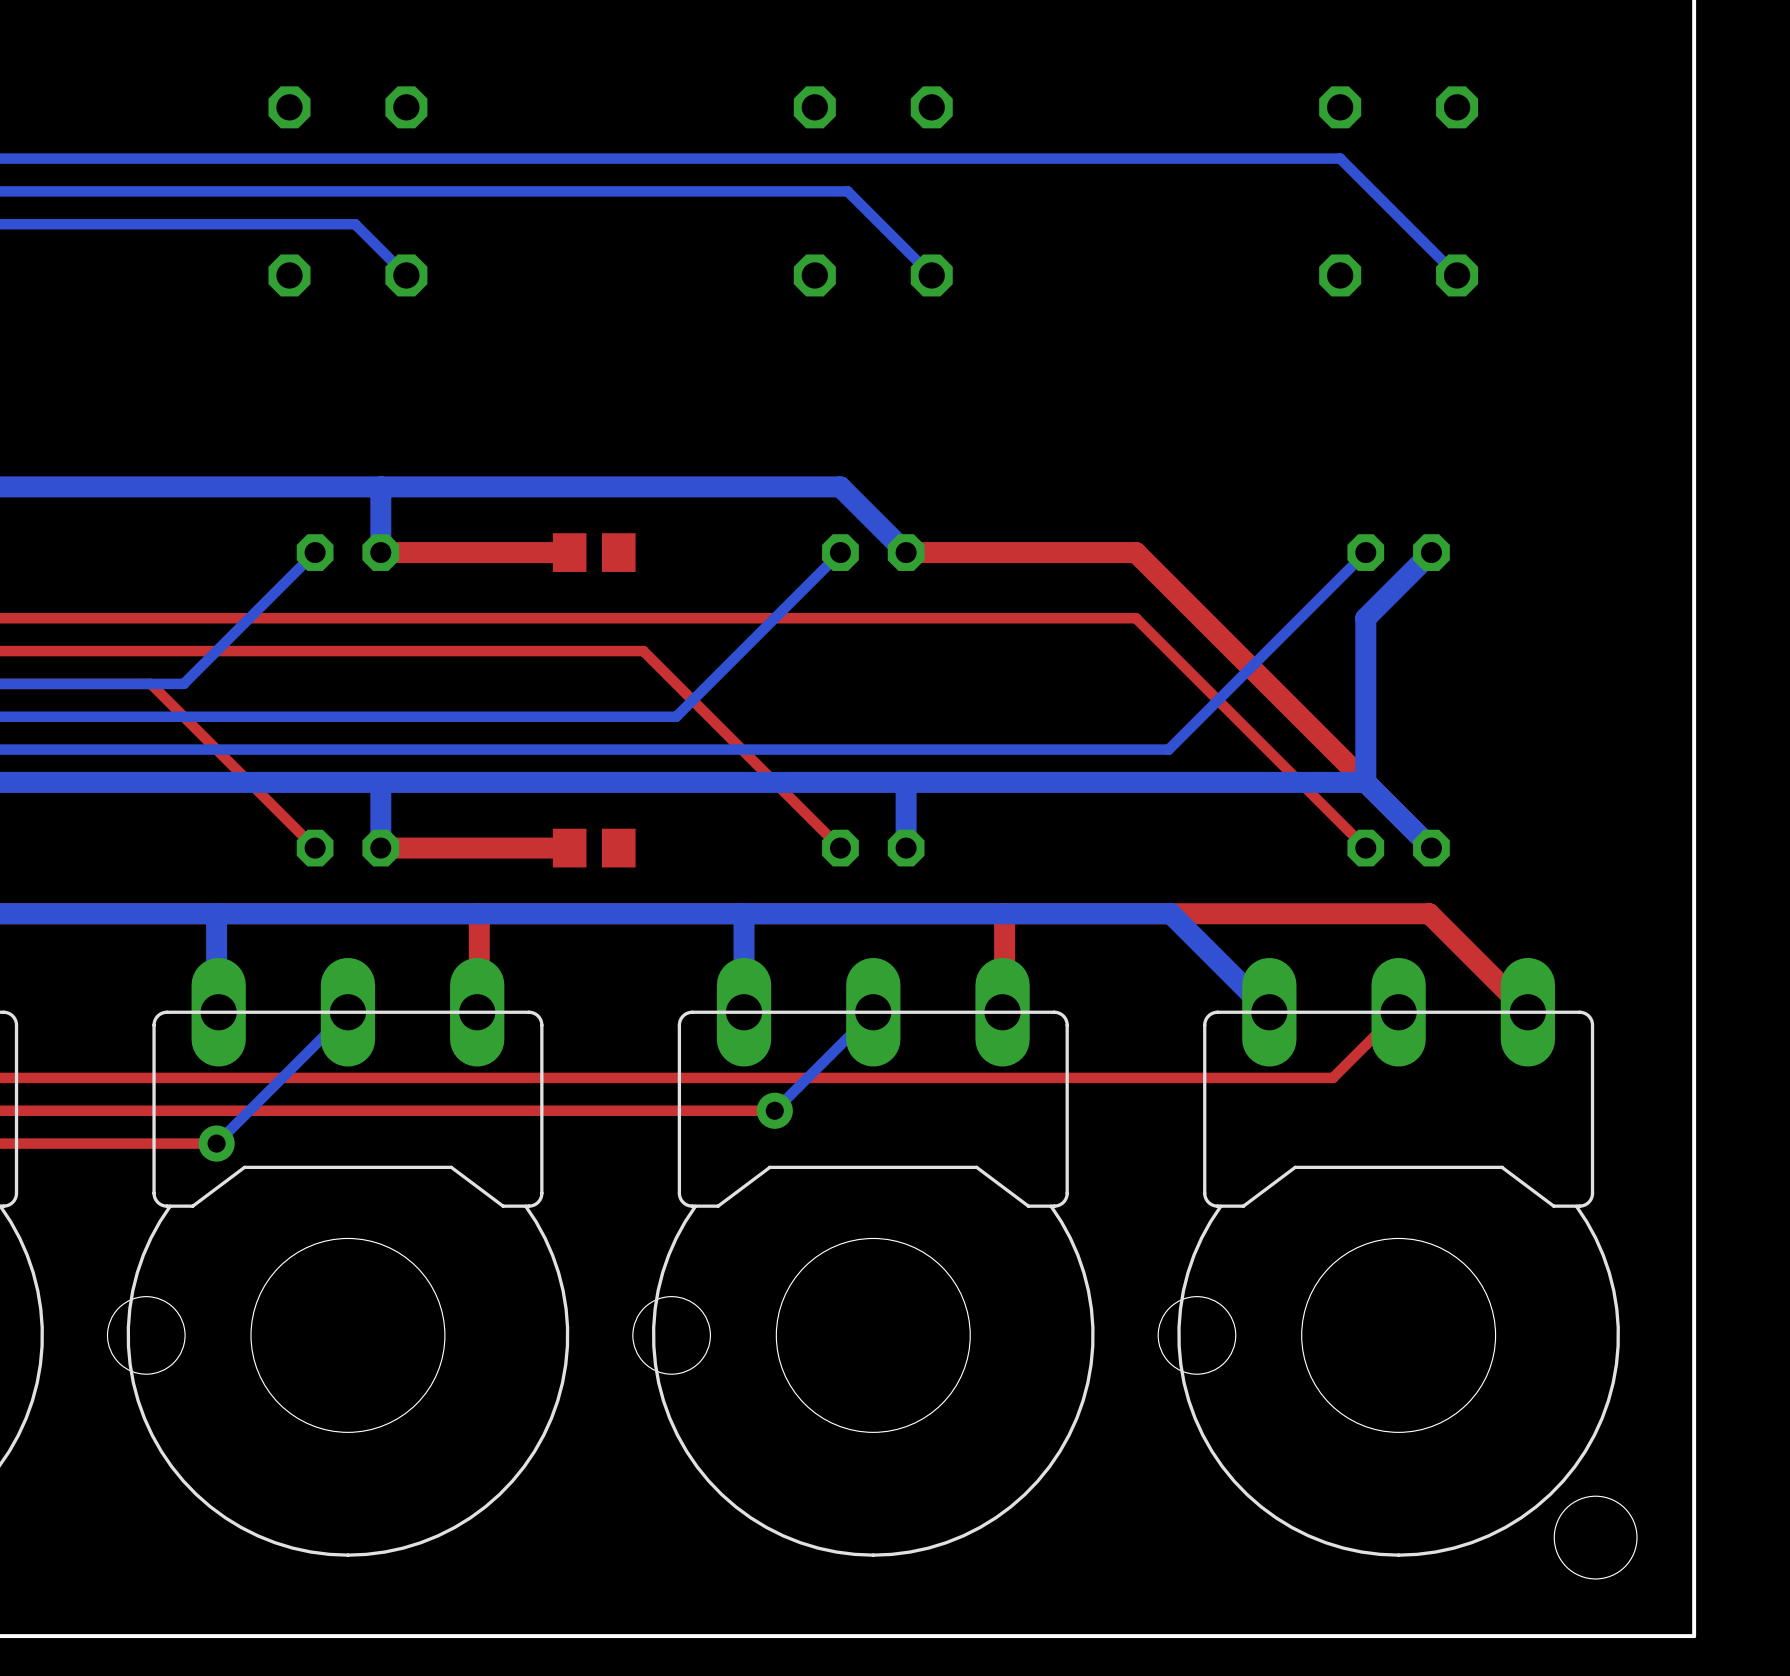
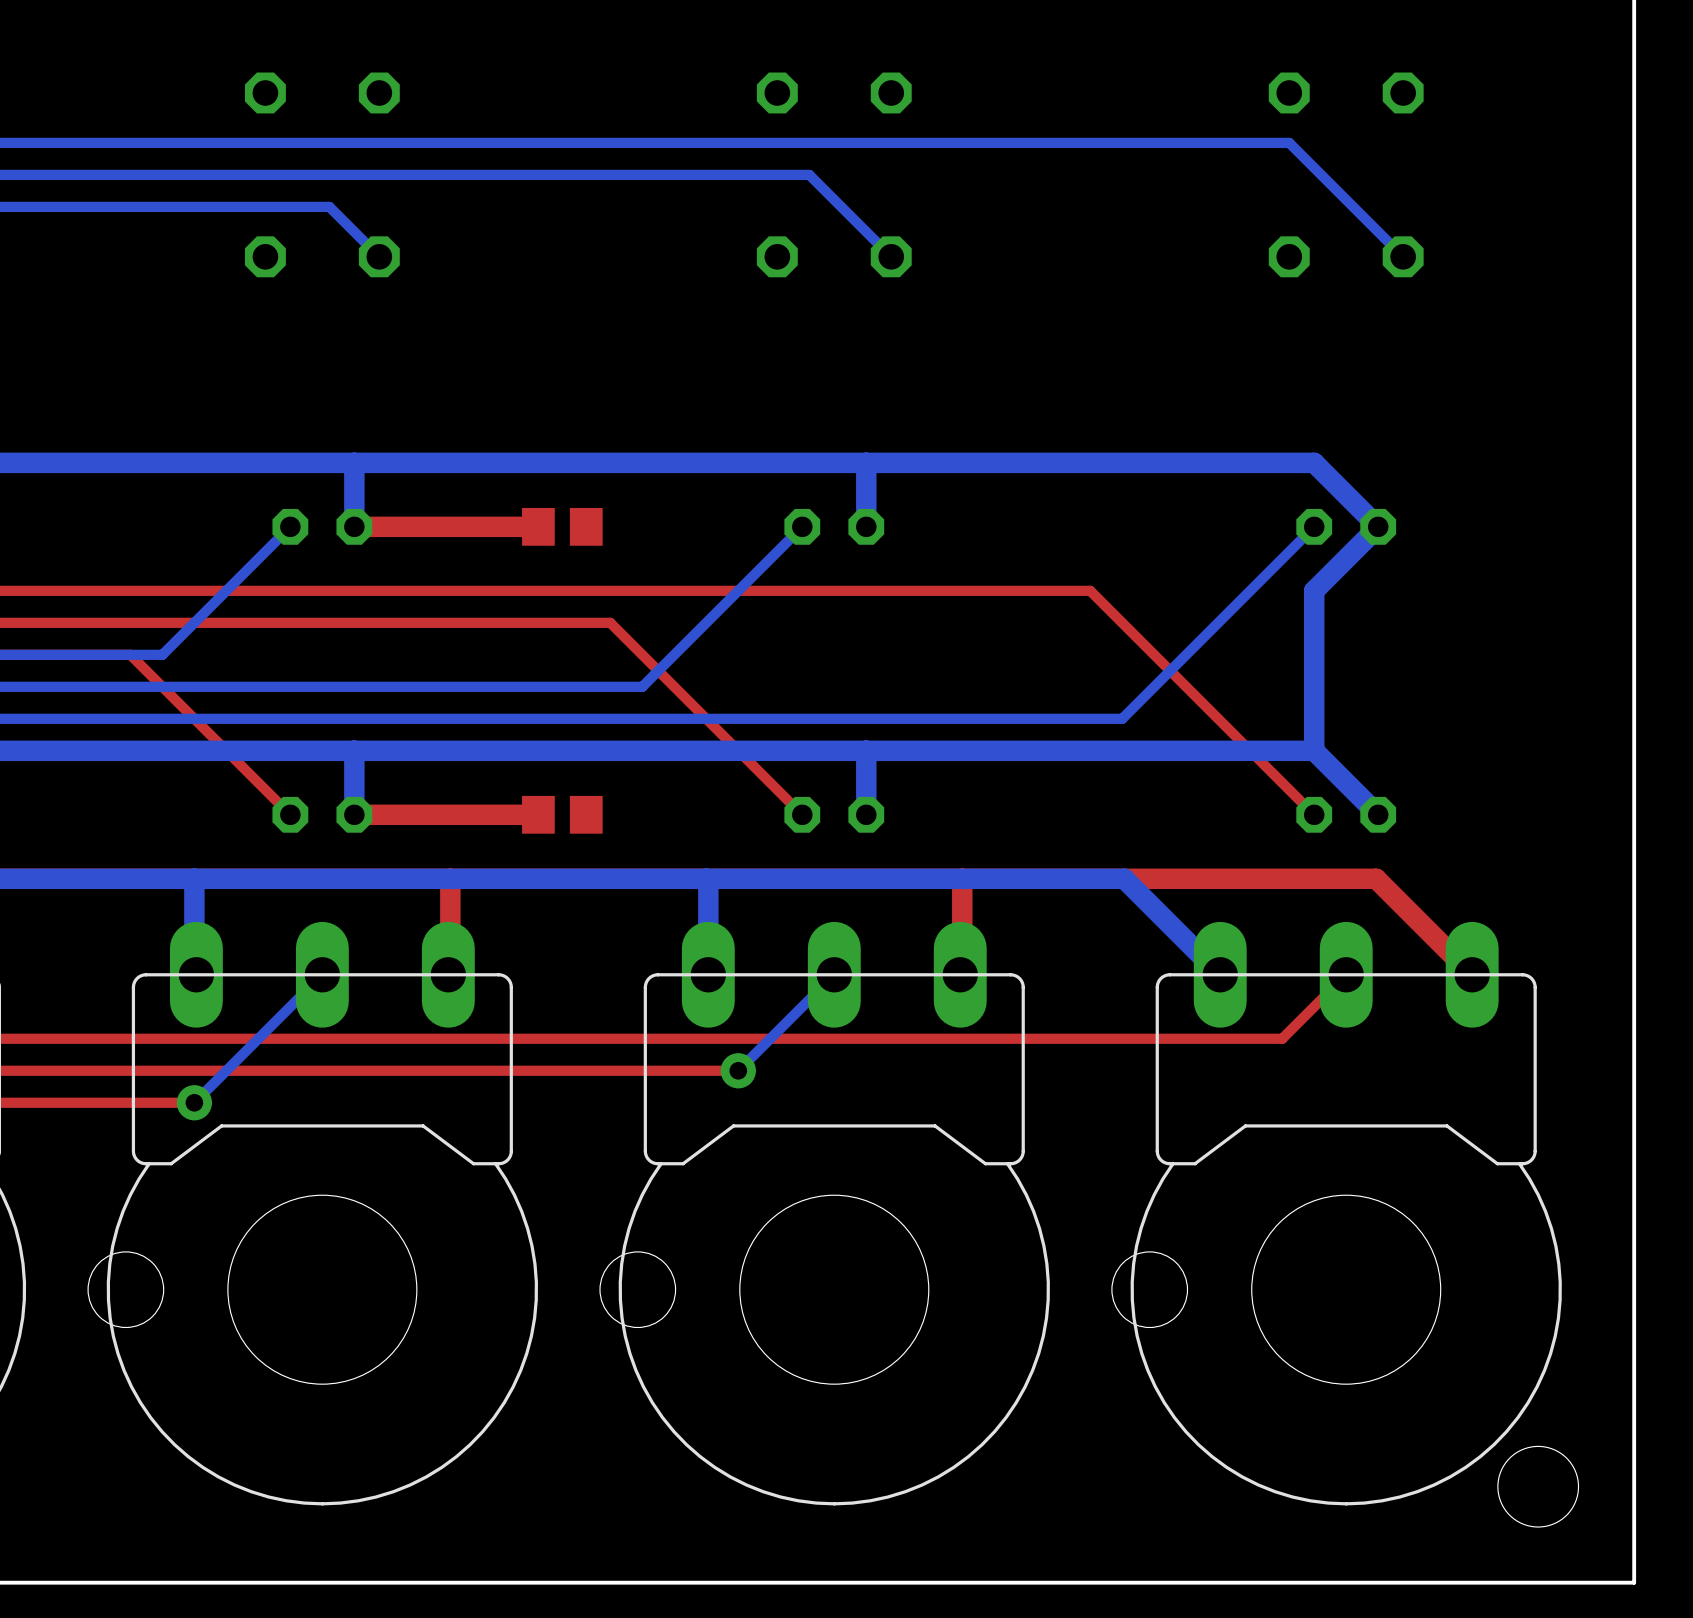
bottom track: (840, 486) (906, 552) -> (866, 462) (866, 526)
bottom track: none -> (802, 462) (1314, 462) (1378, 526)
top track: (906, 552) (1135, 552) (1431, 848) -> none

